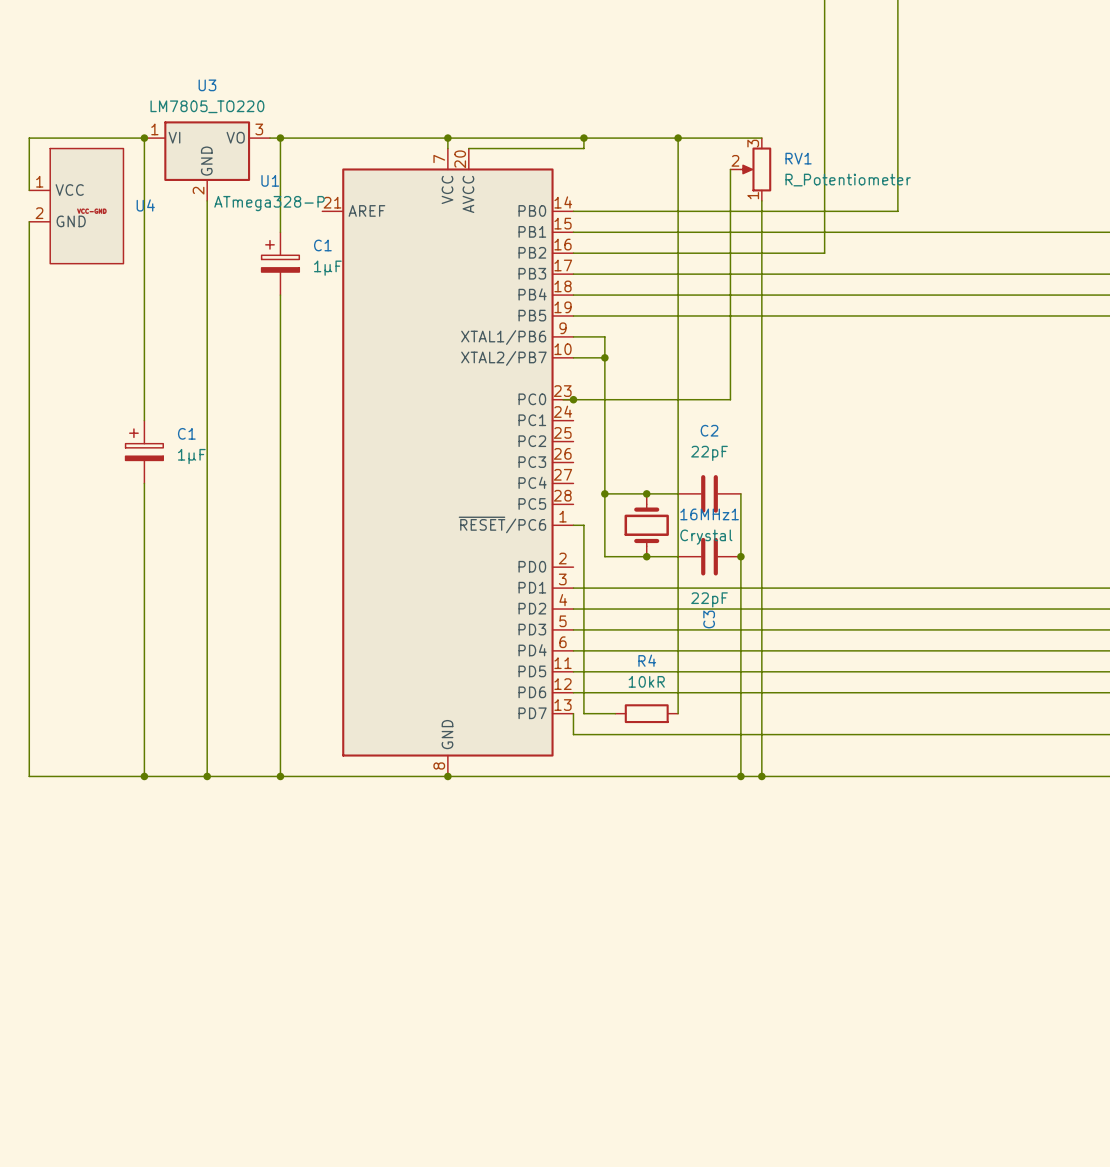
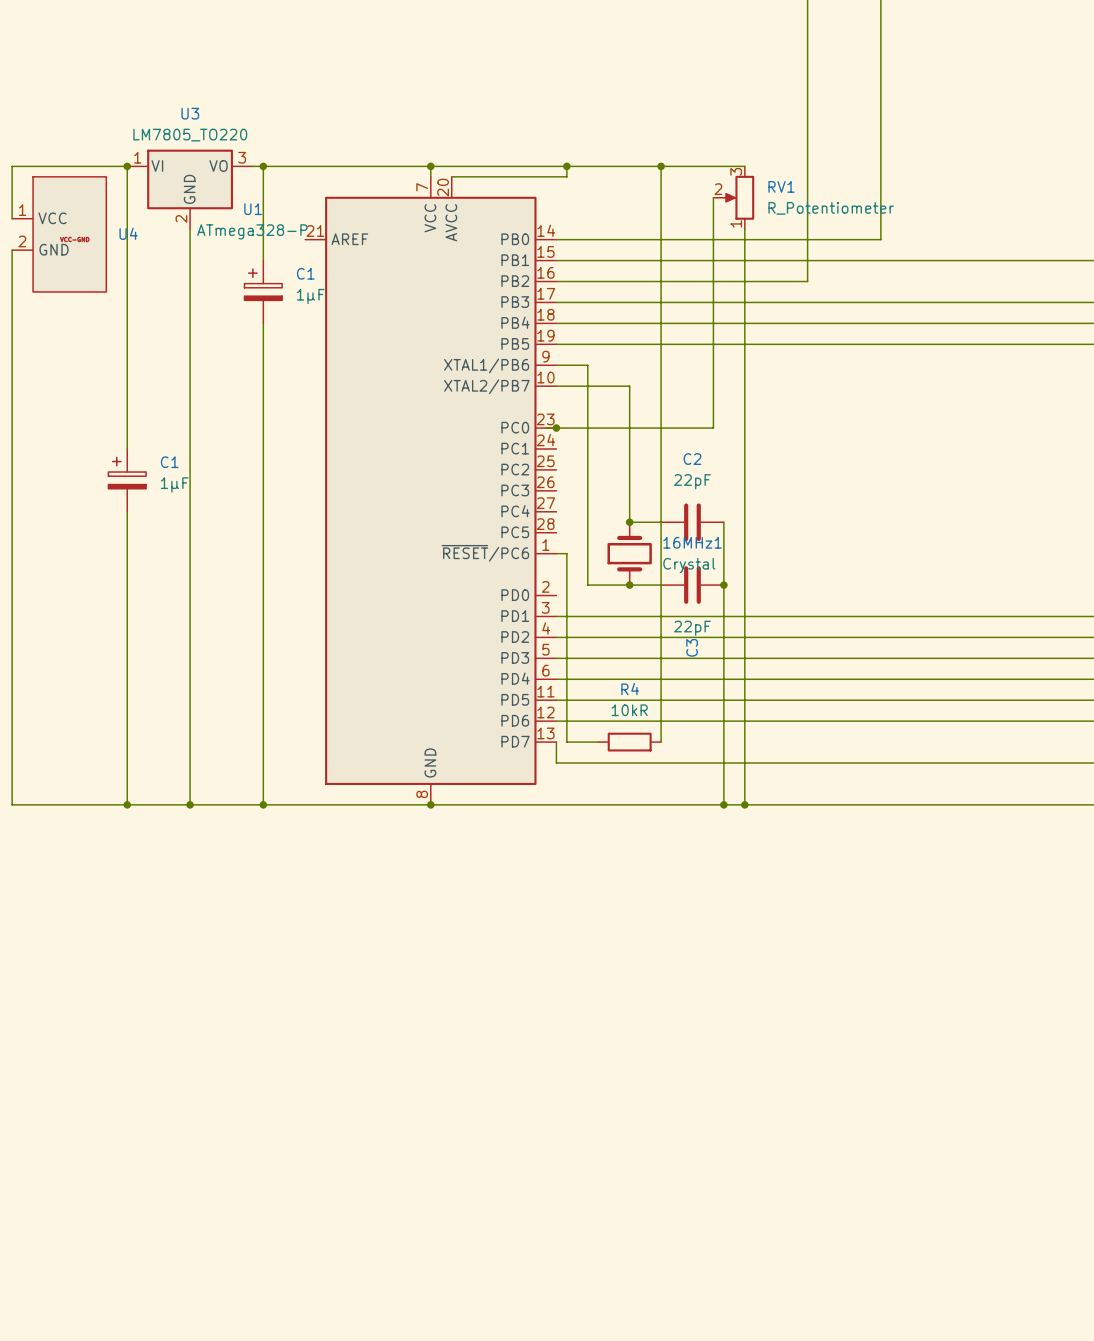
junction: (604, 357) -> none
wire: (604, 493) (646, 493) -> (587, 386) (629, 386) (629, 522)
junction: (604, 493) -> none

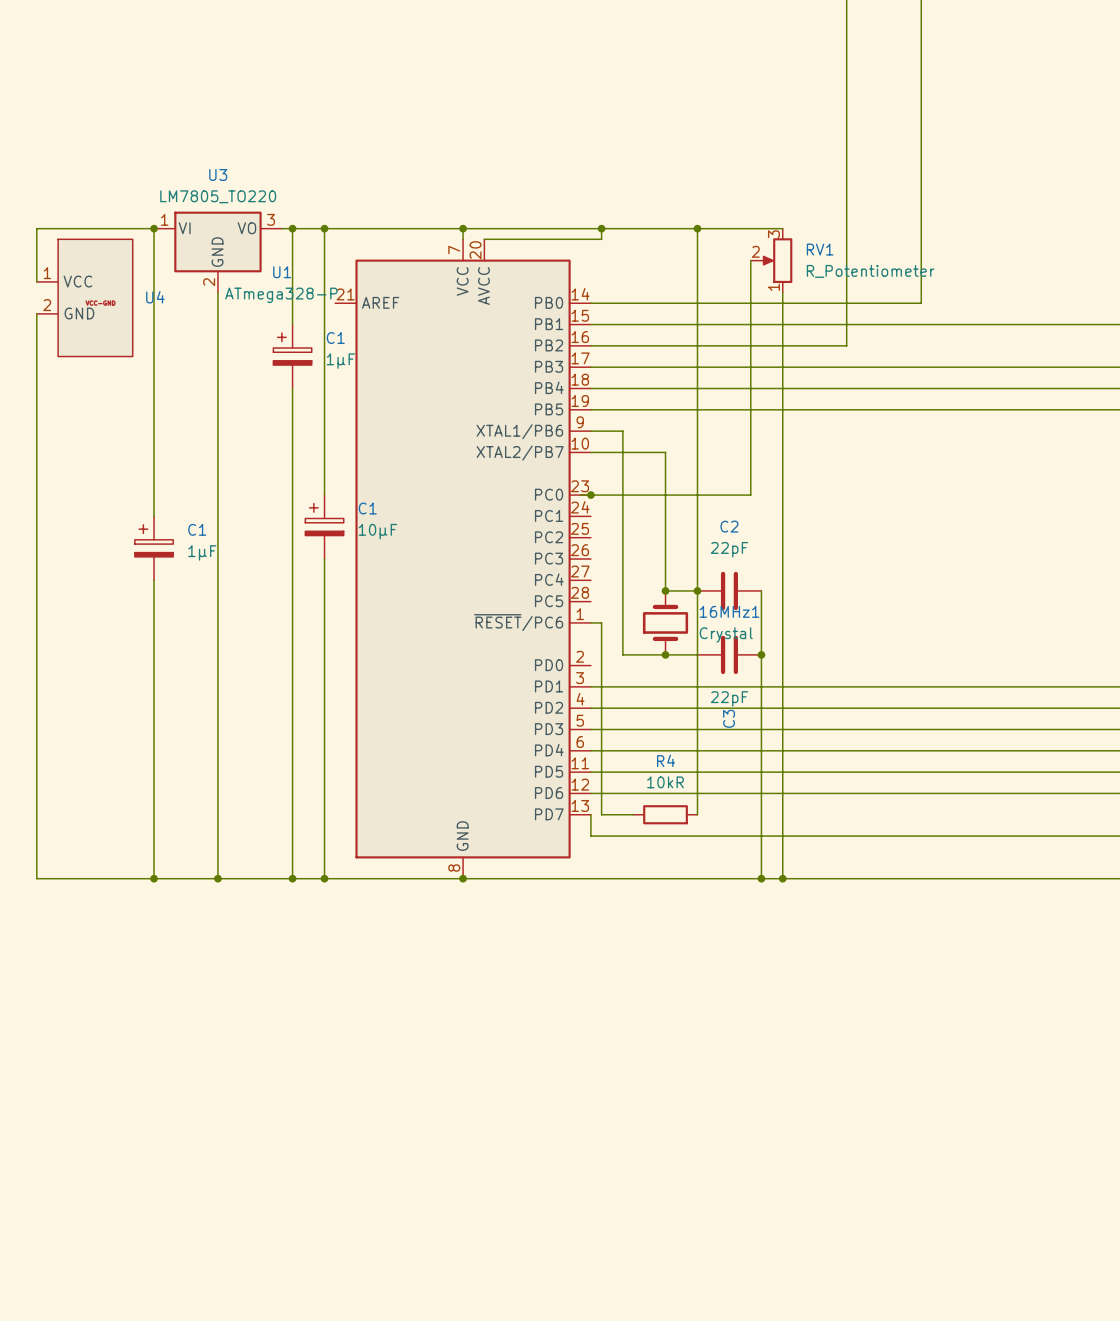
wire: none -> (324, 228) (324, 495)
junction: none -> (324, 228)
C1: none -> 10µF (324, 527)
wire: none -> (324, 559) (324, 878)
junction: none -> (697, 590)
junction: none -> (324, 878)

